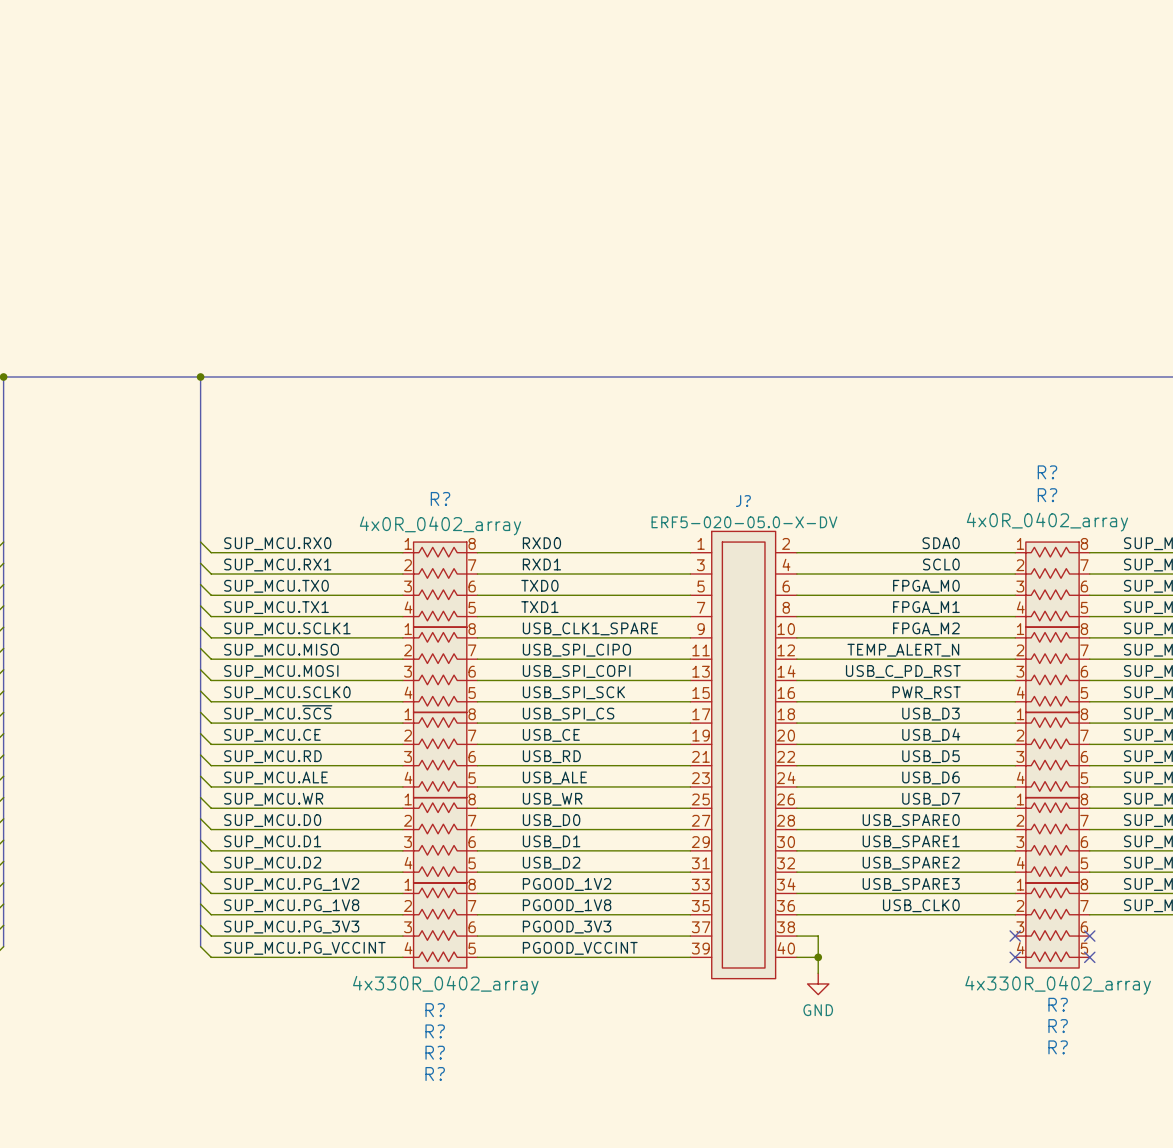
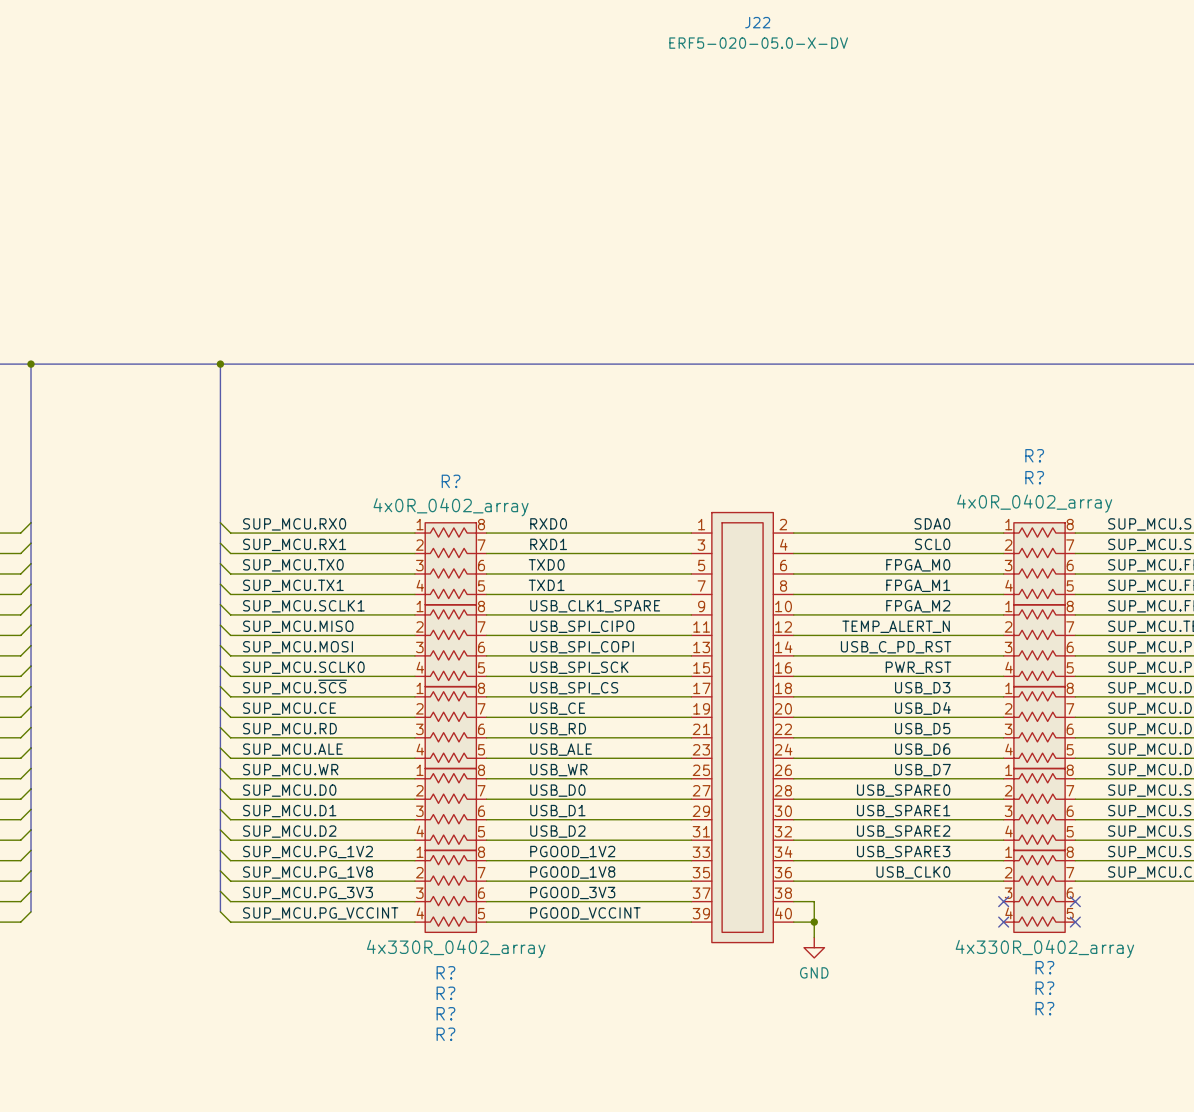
J? name: J? (743, 501) -> J22 (757, 22)
J? value position: ERF5-020-05.0-X-DV (744, 522) -> ERF5-020-05.0-X-DV (758, 43)

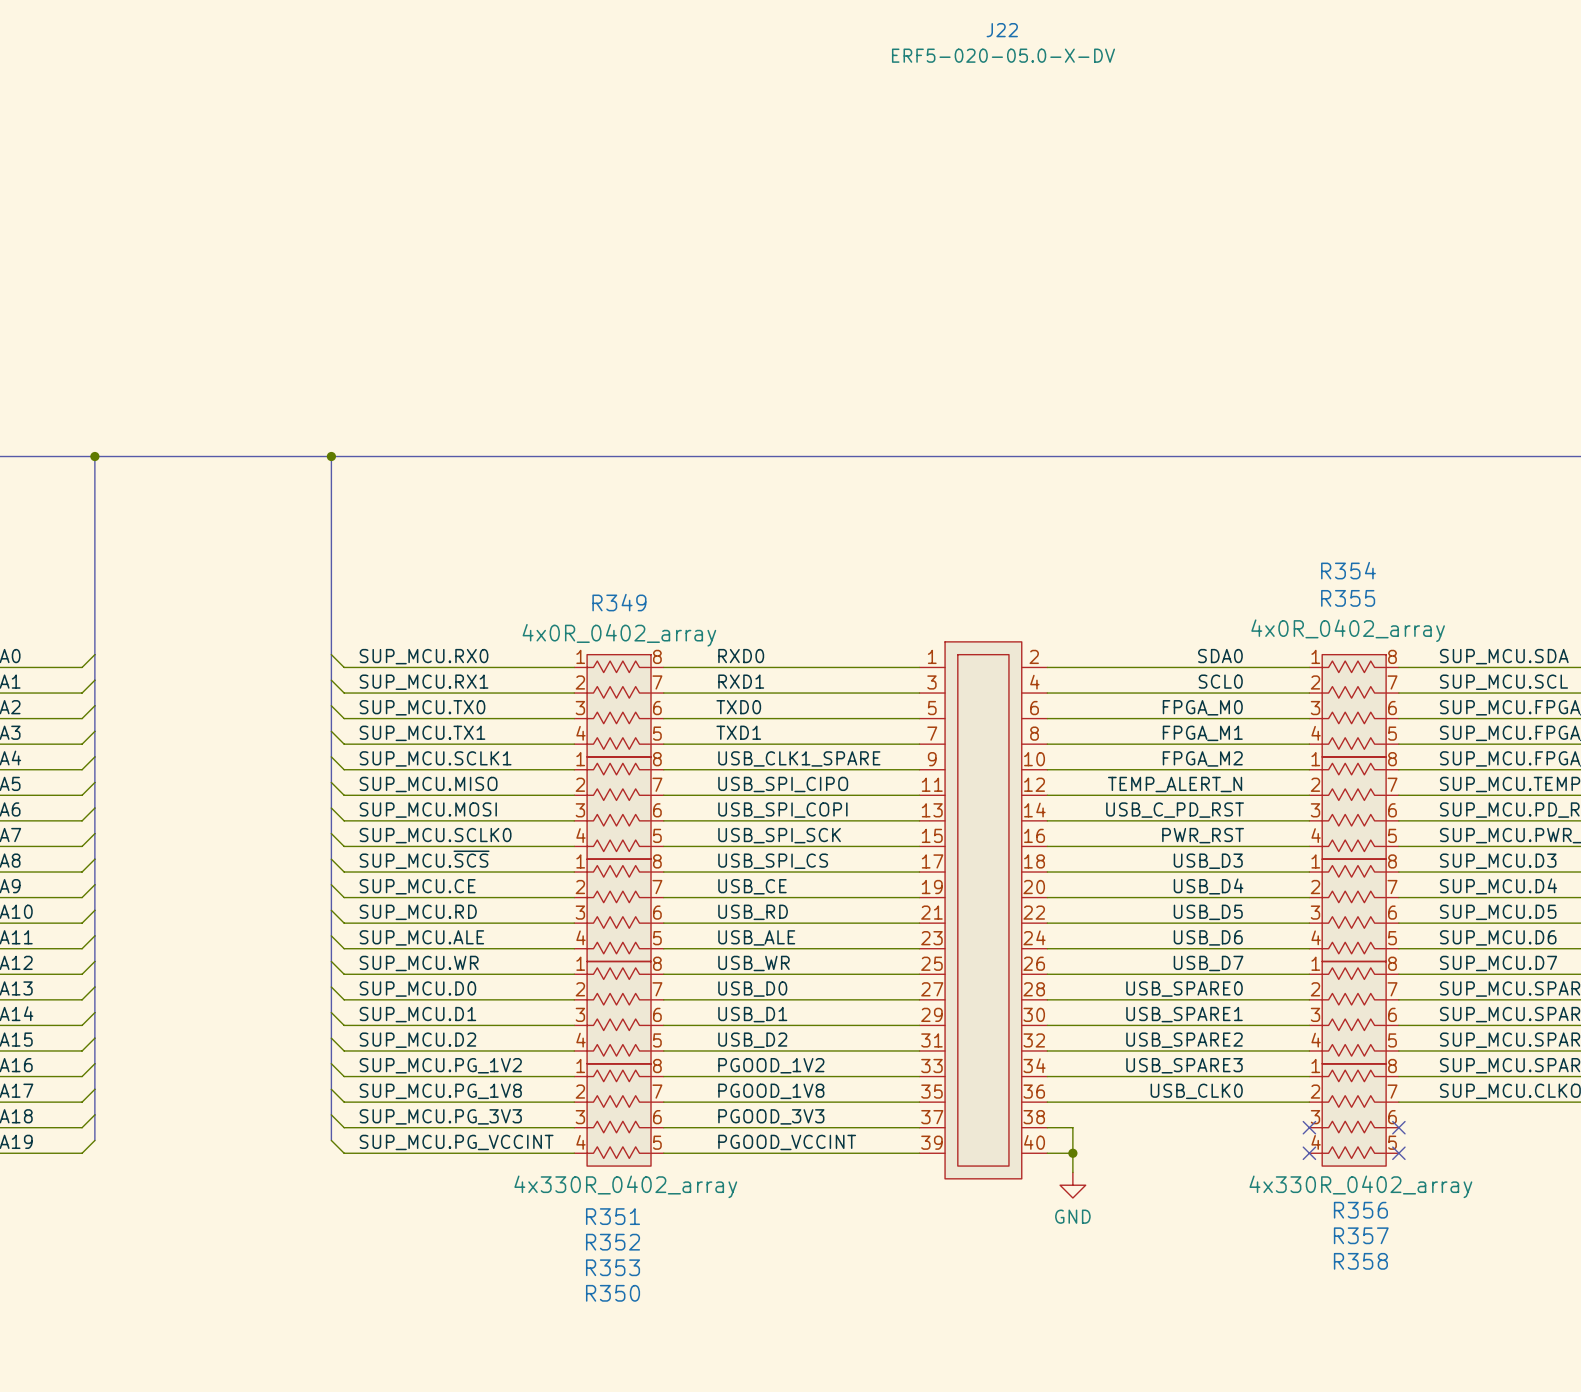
R? name: R? (1034, 455) -> R354 (1348, 570)
R? name: R? (1034, 477) -> R355 (1348, 598)
R? name: R? (451, 481) -> R349 (619, 602)
R? name: R? (1044, 967) -> R356 (1360, 1210)
R? name: R? (445, 972) -> R351 (613, 1216)
R? name: R? (1044, 988) -> R357 (1361, 1235)
R? name: R? (445, 993) -> R352 (613, 1242)
R? name: R? (1044, 1008) -> R358 (1360, 1261)
R? name: R? (445, 1013) -> R353 (613, 1267)
R? name: R? (445, 1034) -> R350 (613, 1293)

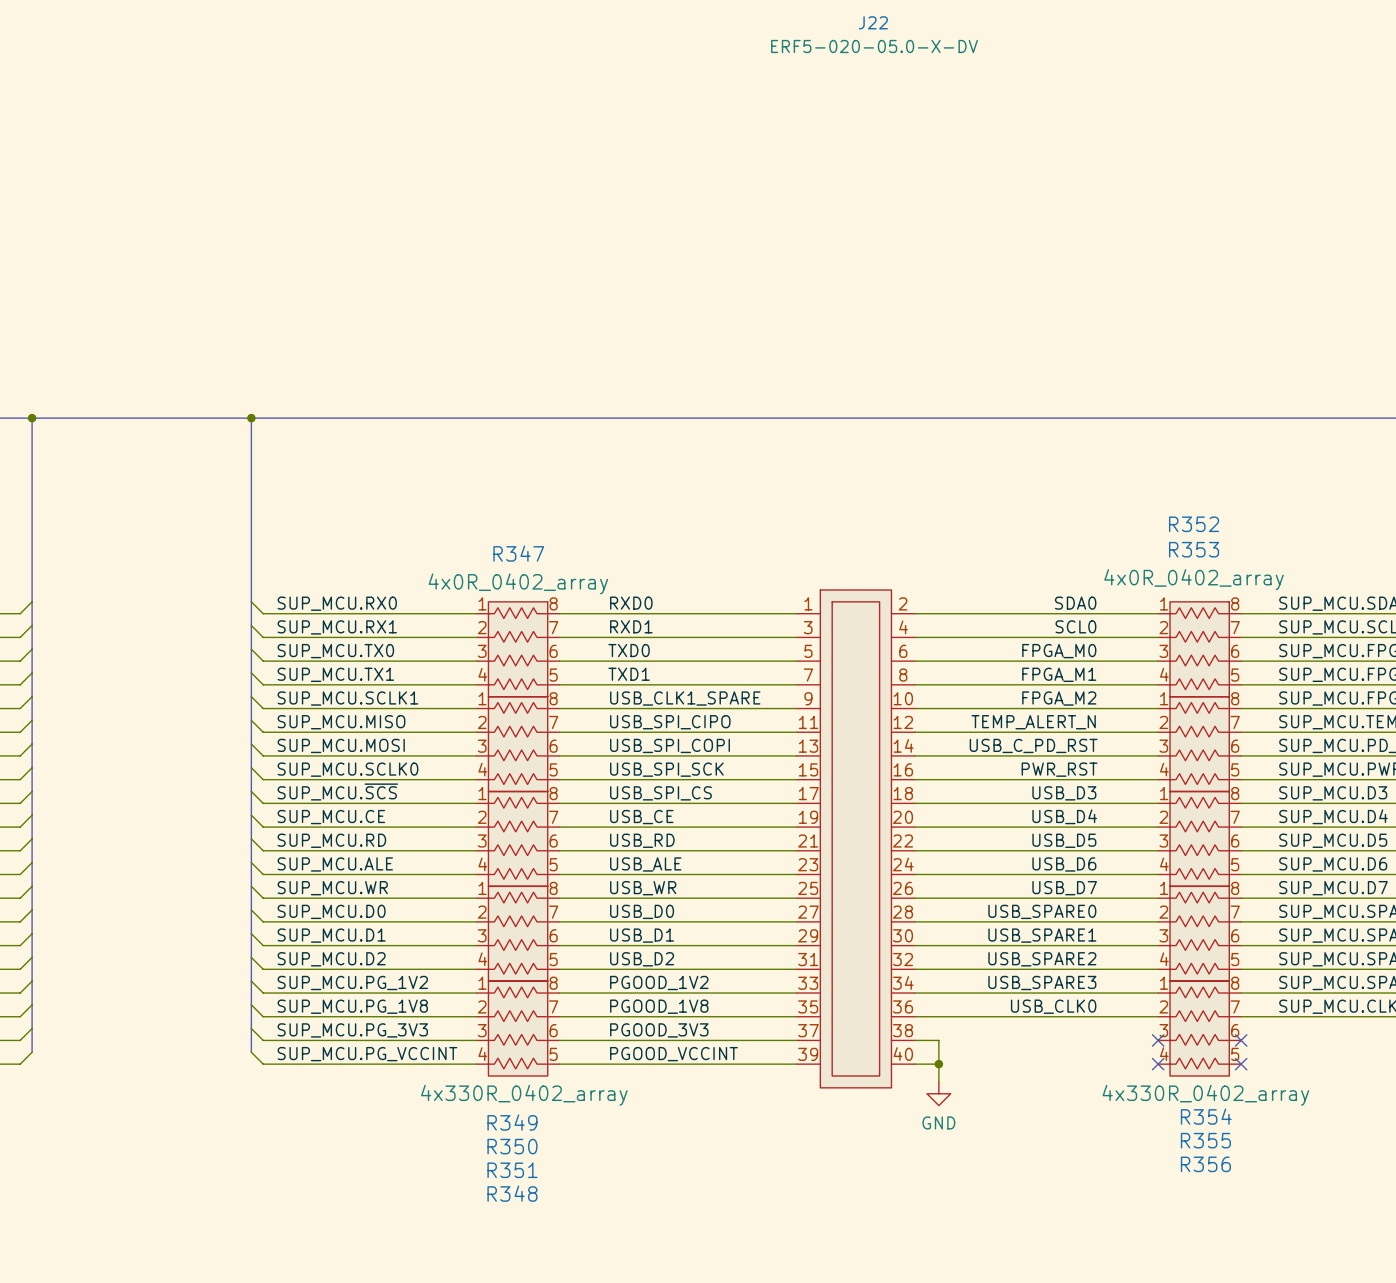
R354 name: R354 (1348, 570) -> R352 (1194, 524)
R355 name: R355 (1348, 598) -> R353 (1194, 549)
R349 name: R349 (619, 602) -> R347 (518, 553)
R356 name: R356 (1360, 1210) -> R354 (1206, 1116)
R351 name: R351 (613, 1216) -> R349 (512, 1122)
R357 name: R357 (1361, 1235) -> R355 (1205, 1140)
R352 name: R352 (613, 1242) -> R350 (512, 1146)
R358 name: R358 (1360, 1261) -> R356 (1205, 1164)
R353 name: R353 (613, 1267) -> R351 (512, 1170)
R350 name: R350 (613, 1293) -> R348 (512, 1193)

